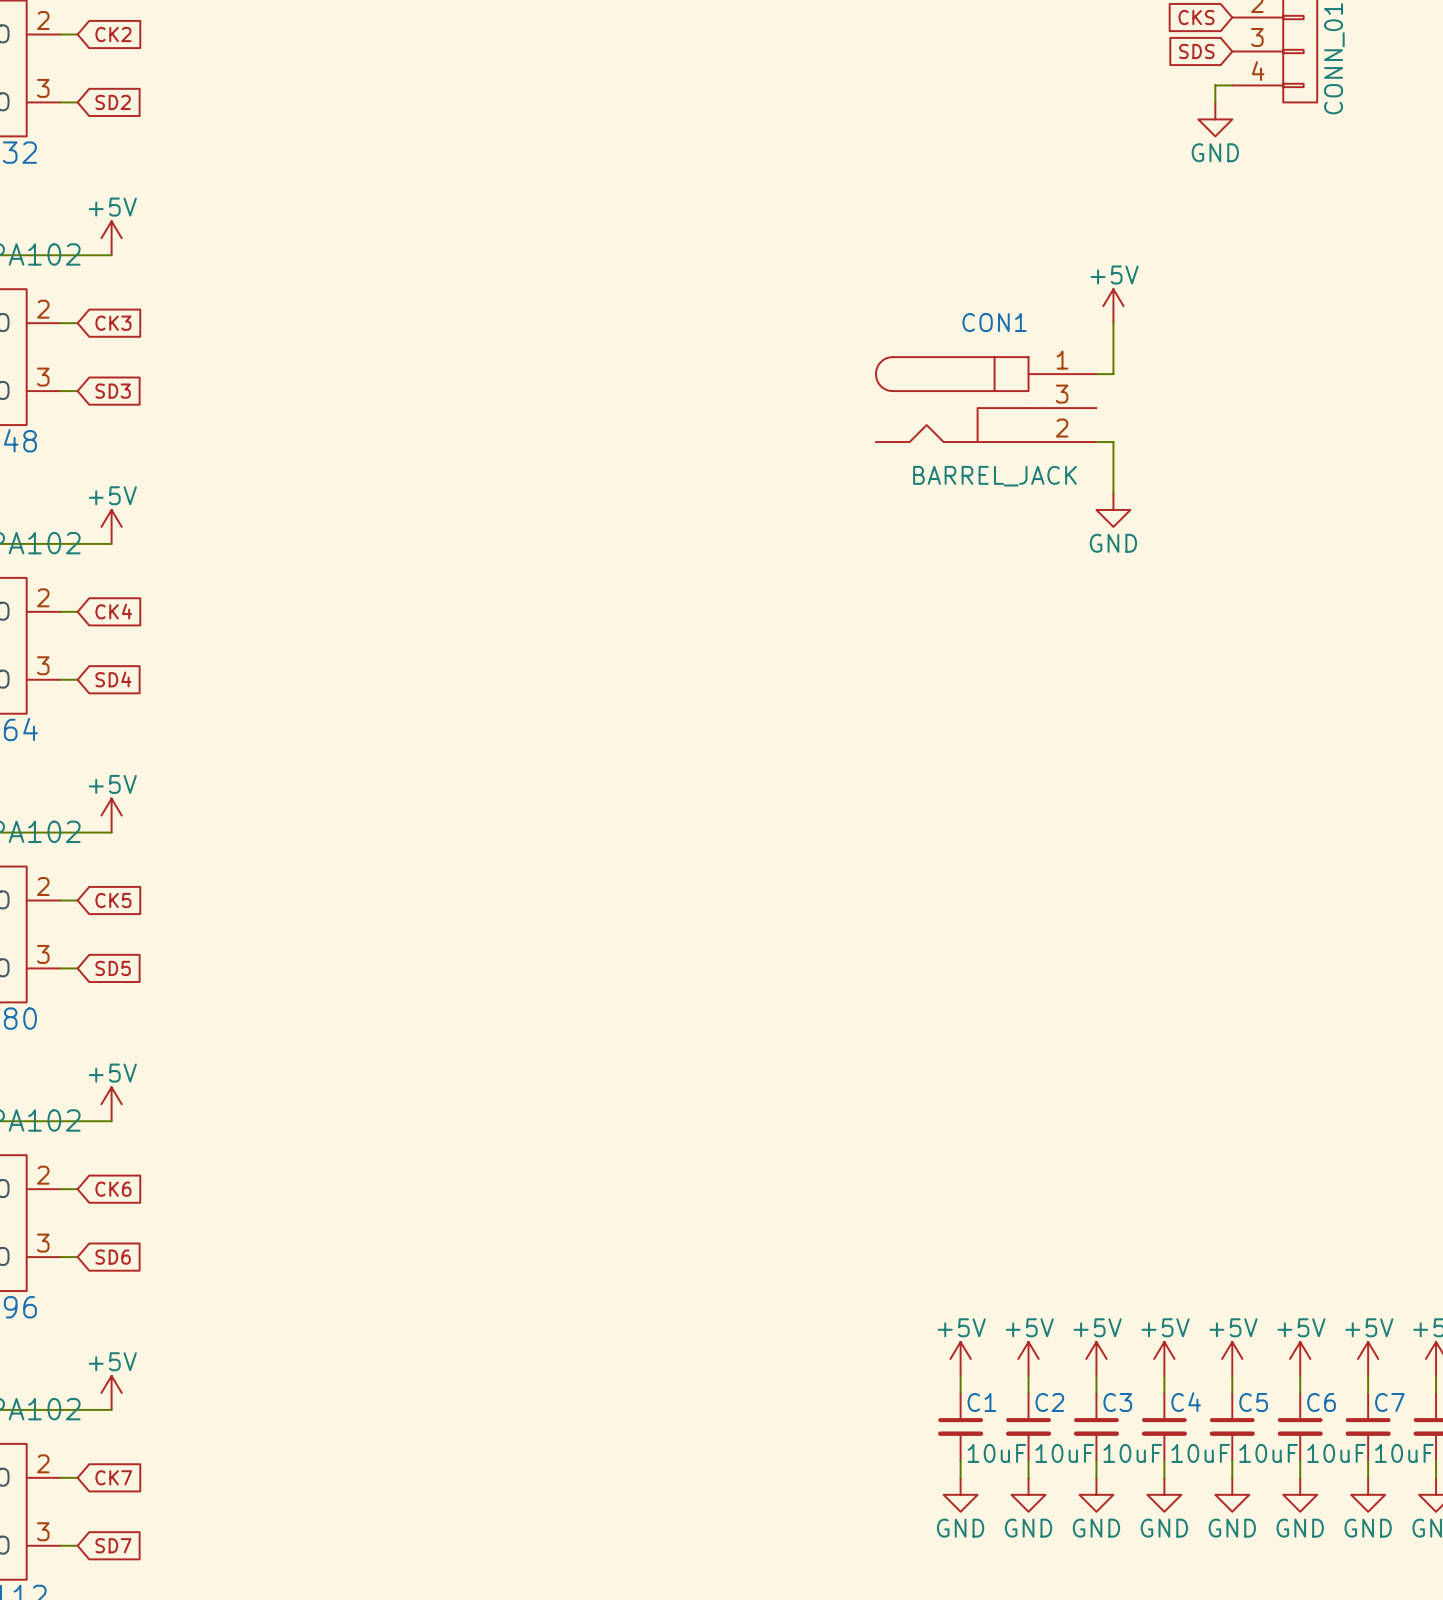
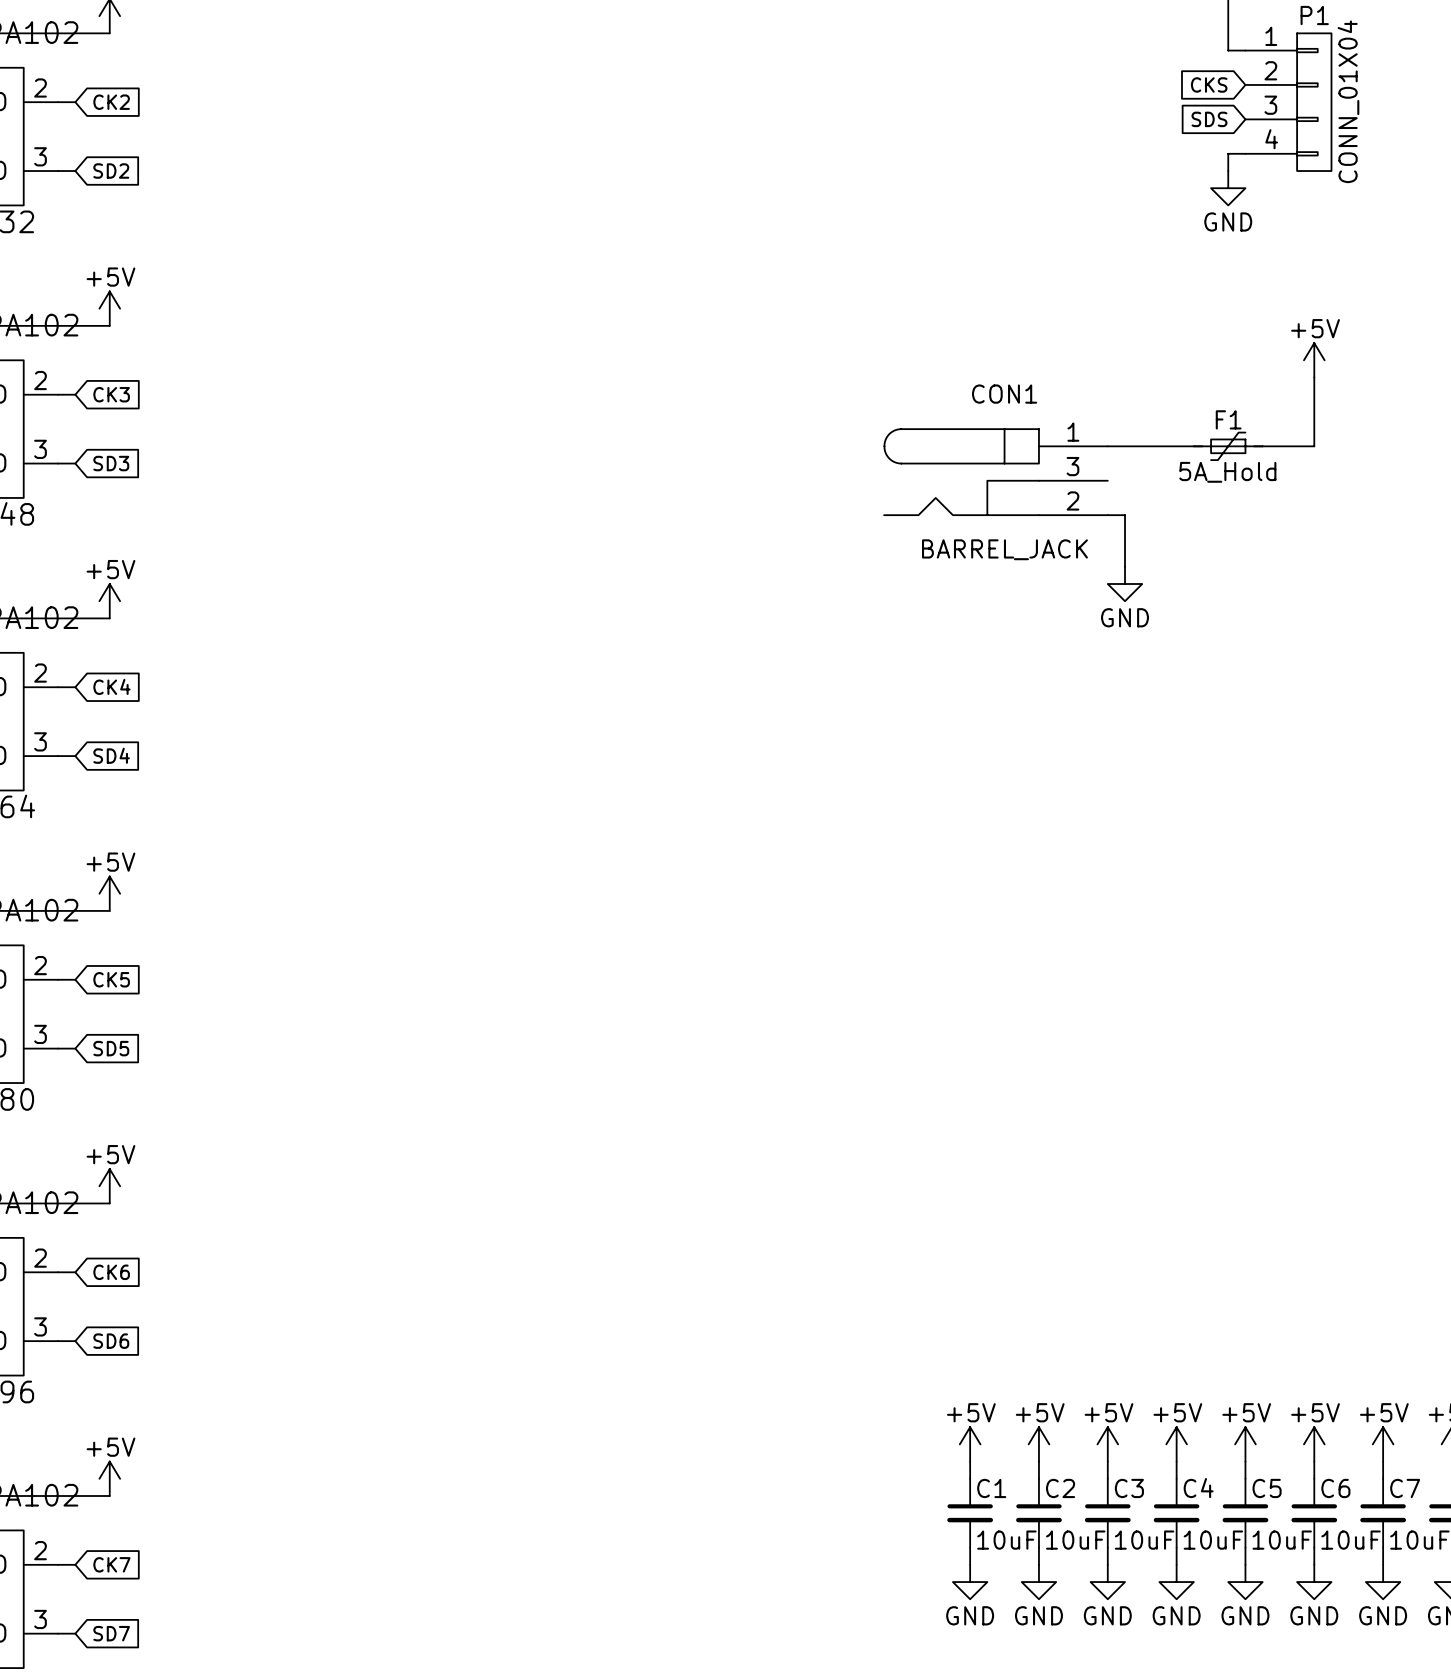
power symbol position: +5V (1113, 306) -> +5V (1314, 360)
wire: none -> (1314, 377) (1314, 446) (1262, 446)
wire: (1113, 323) (1113, 374) -> (1193, 446) (1125, 446)
F1: none -> 5A_Hold (1228, 446)

